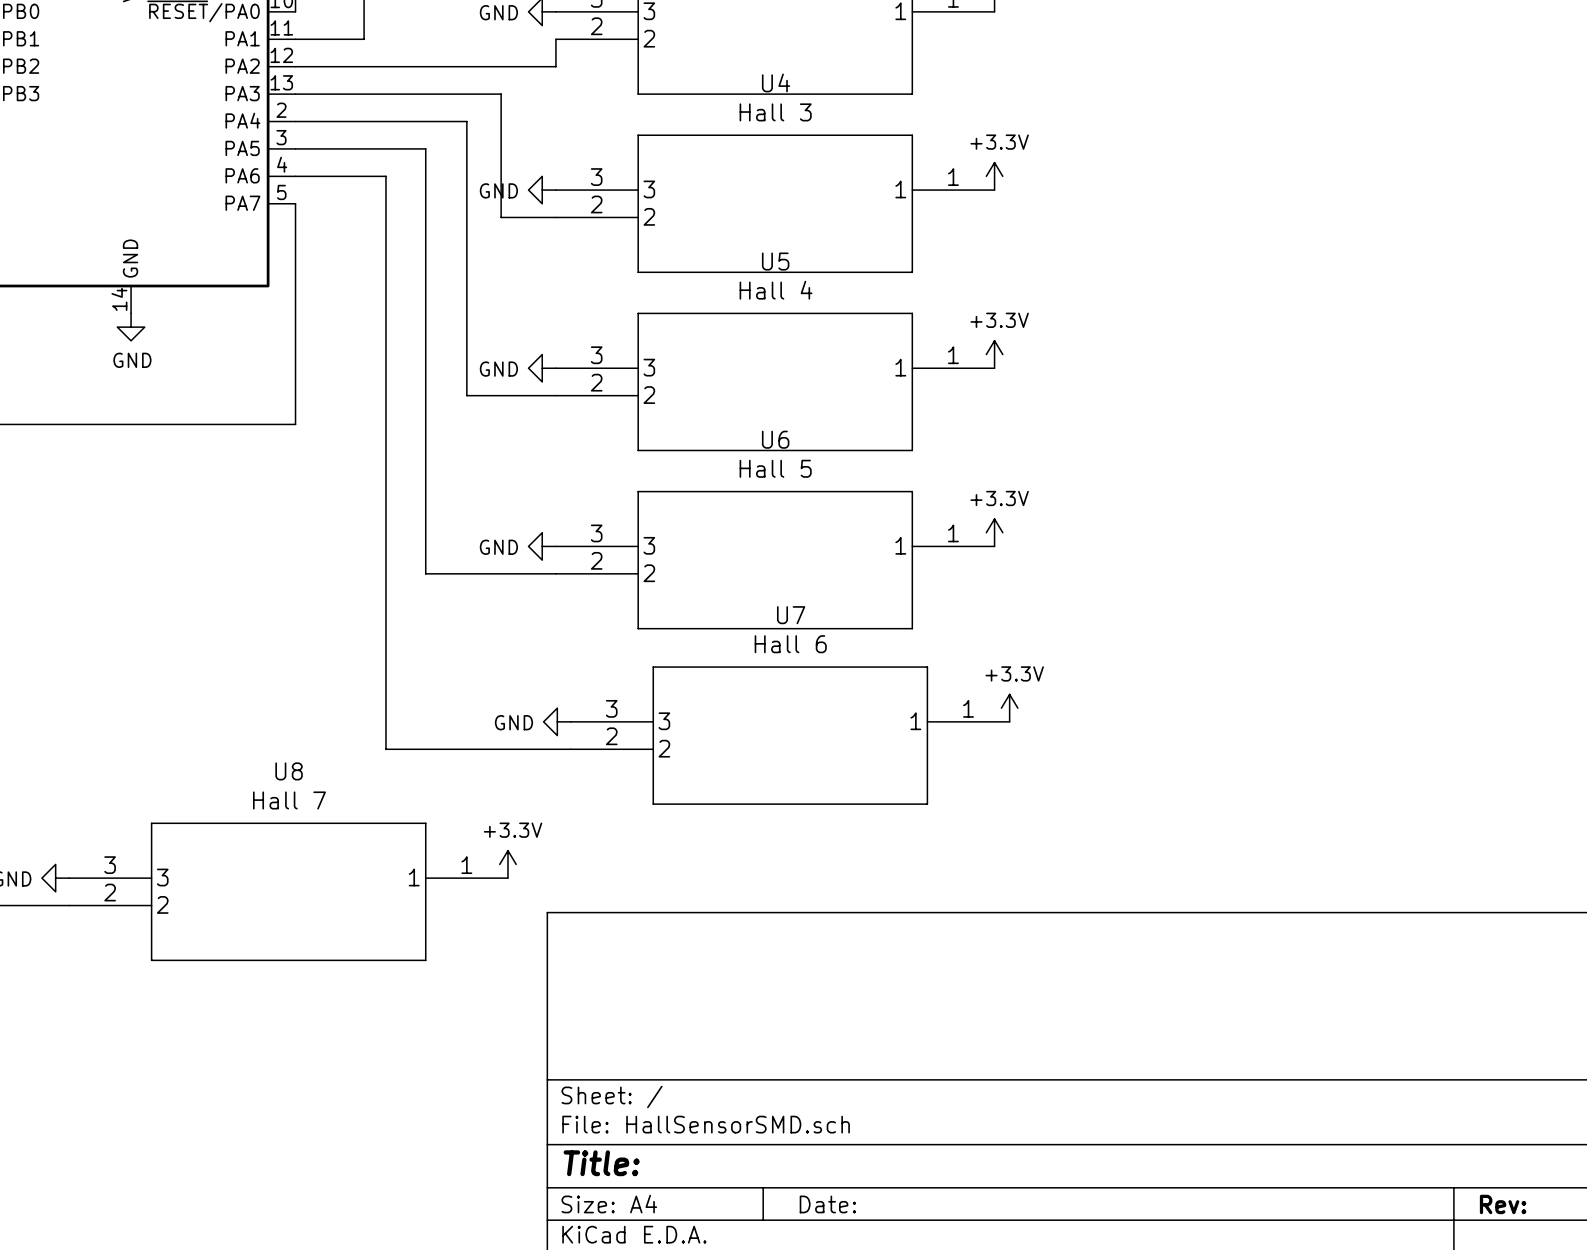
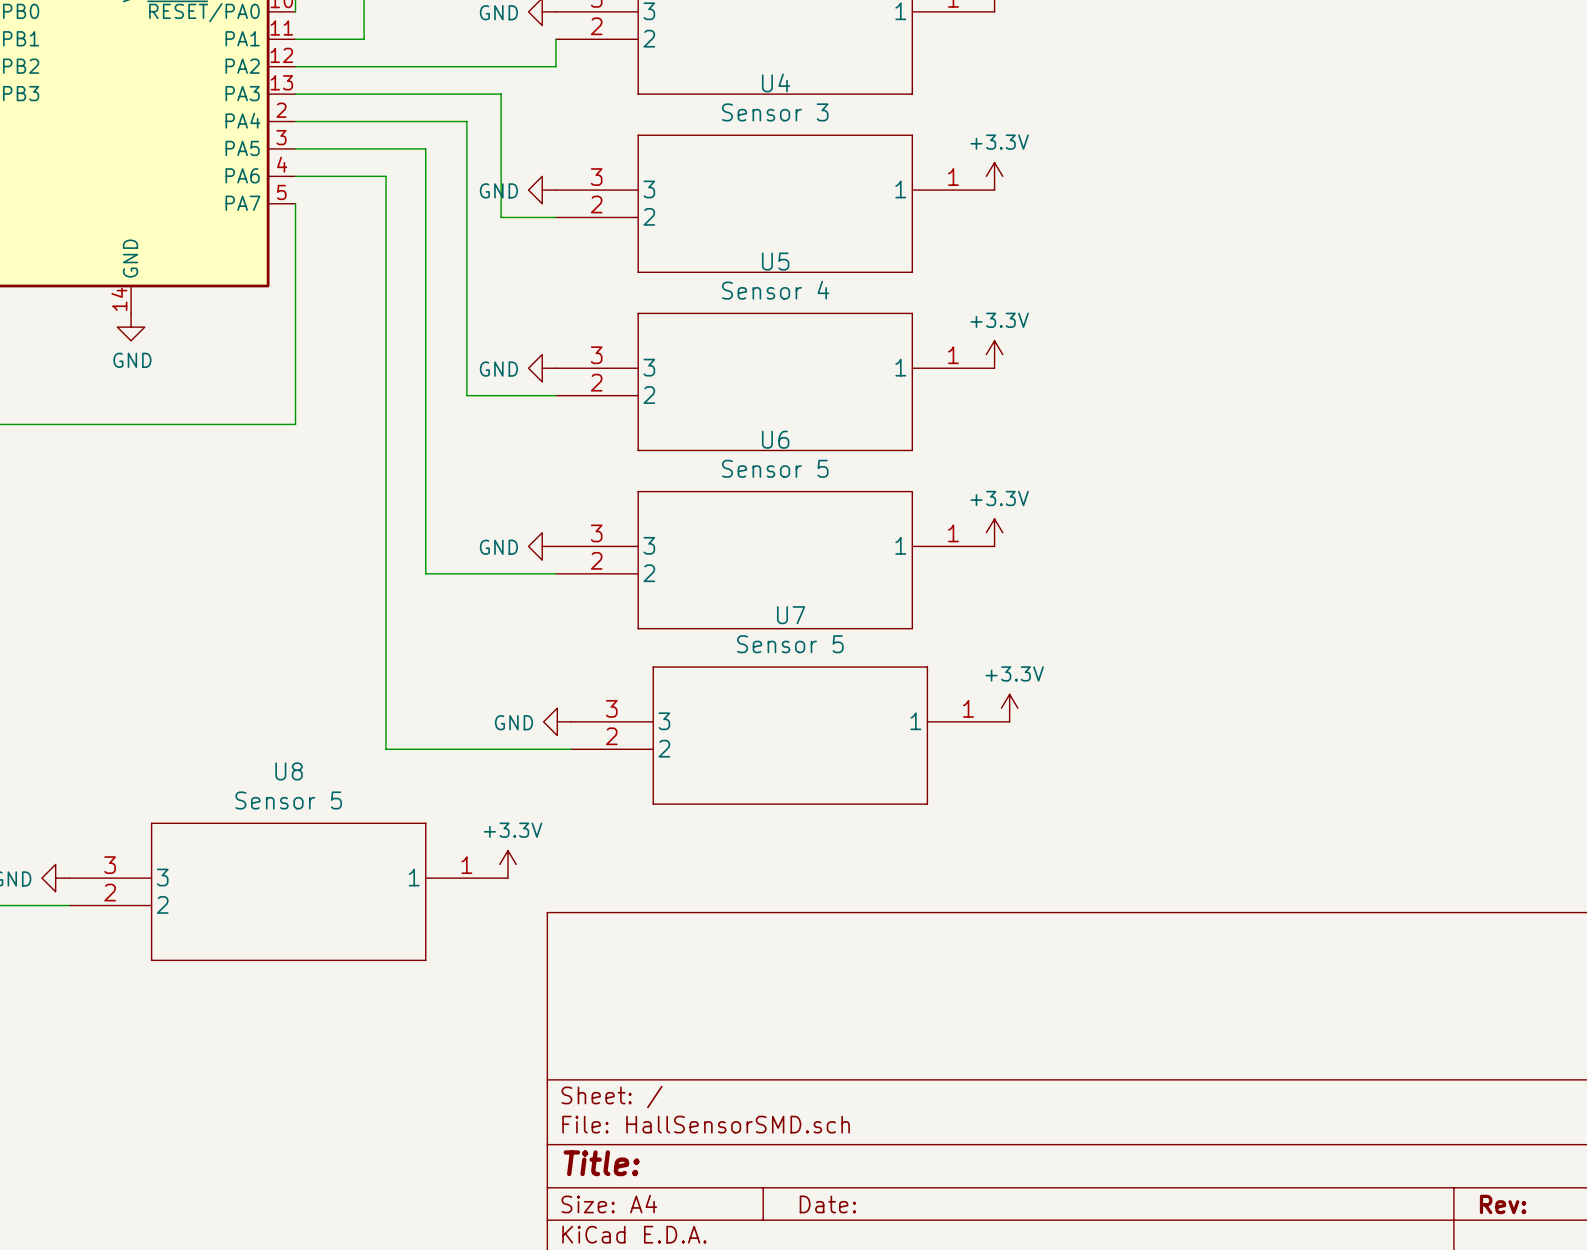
U4 value: Hall 3 (775, 112) -> Sensor 3 (775, 112)
U5 value: Hall 4 (776, 290) -> Sensor 4 (775, 290)
U6 value: Hall 5 (775, 468) -> Sensor 5 (775, 468)
U7 value: Hall 6 (790, 644) -> Sensor 5 (790, 644)
U8 value: Hall 7 (289, 800) -> Sensor 5 (288, 800)

